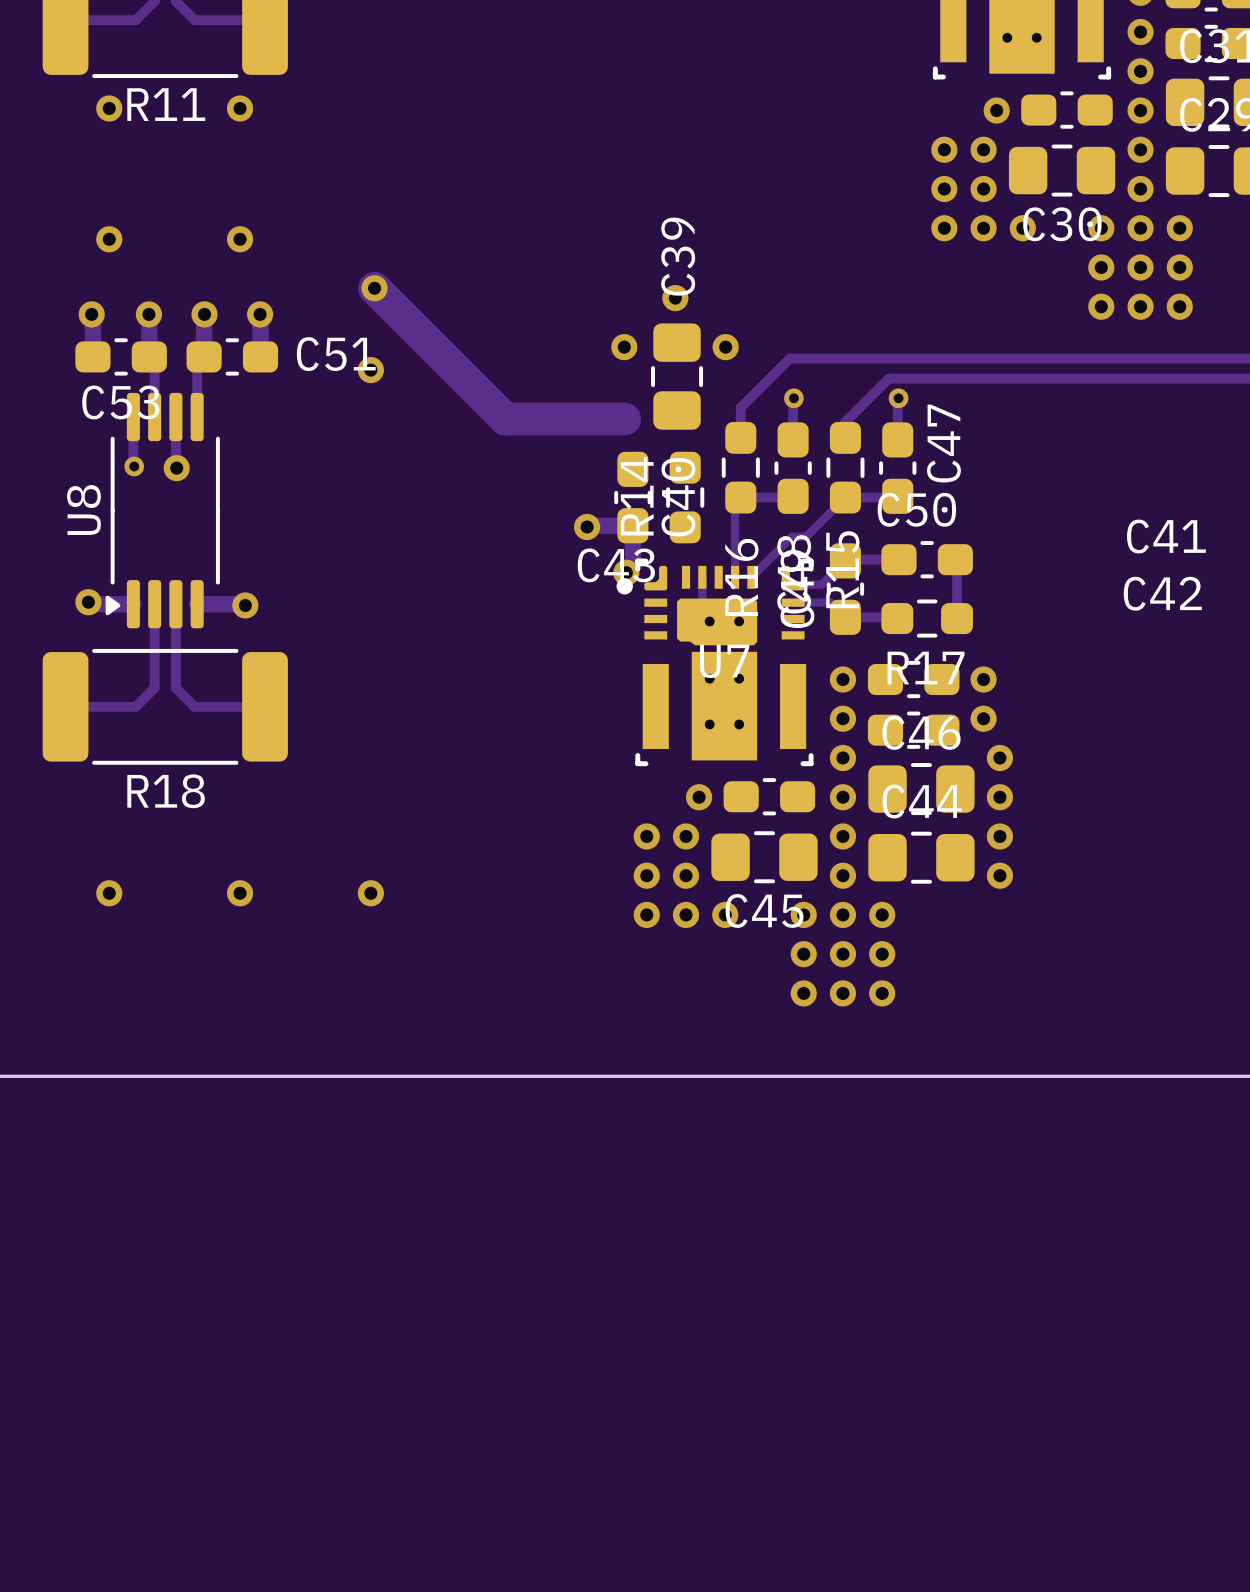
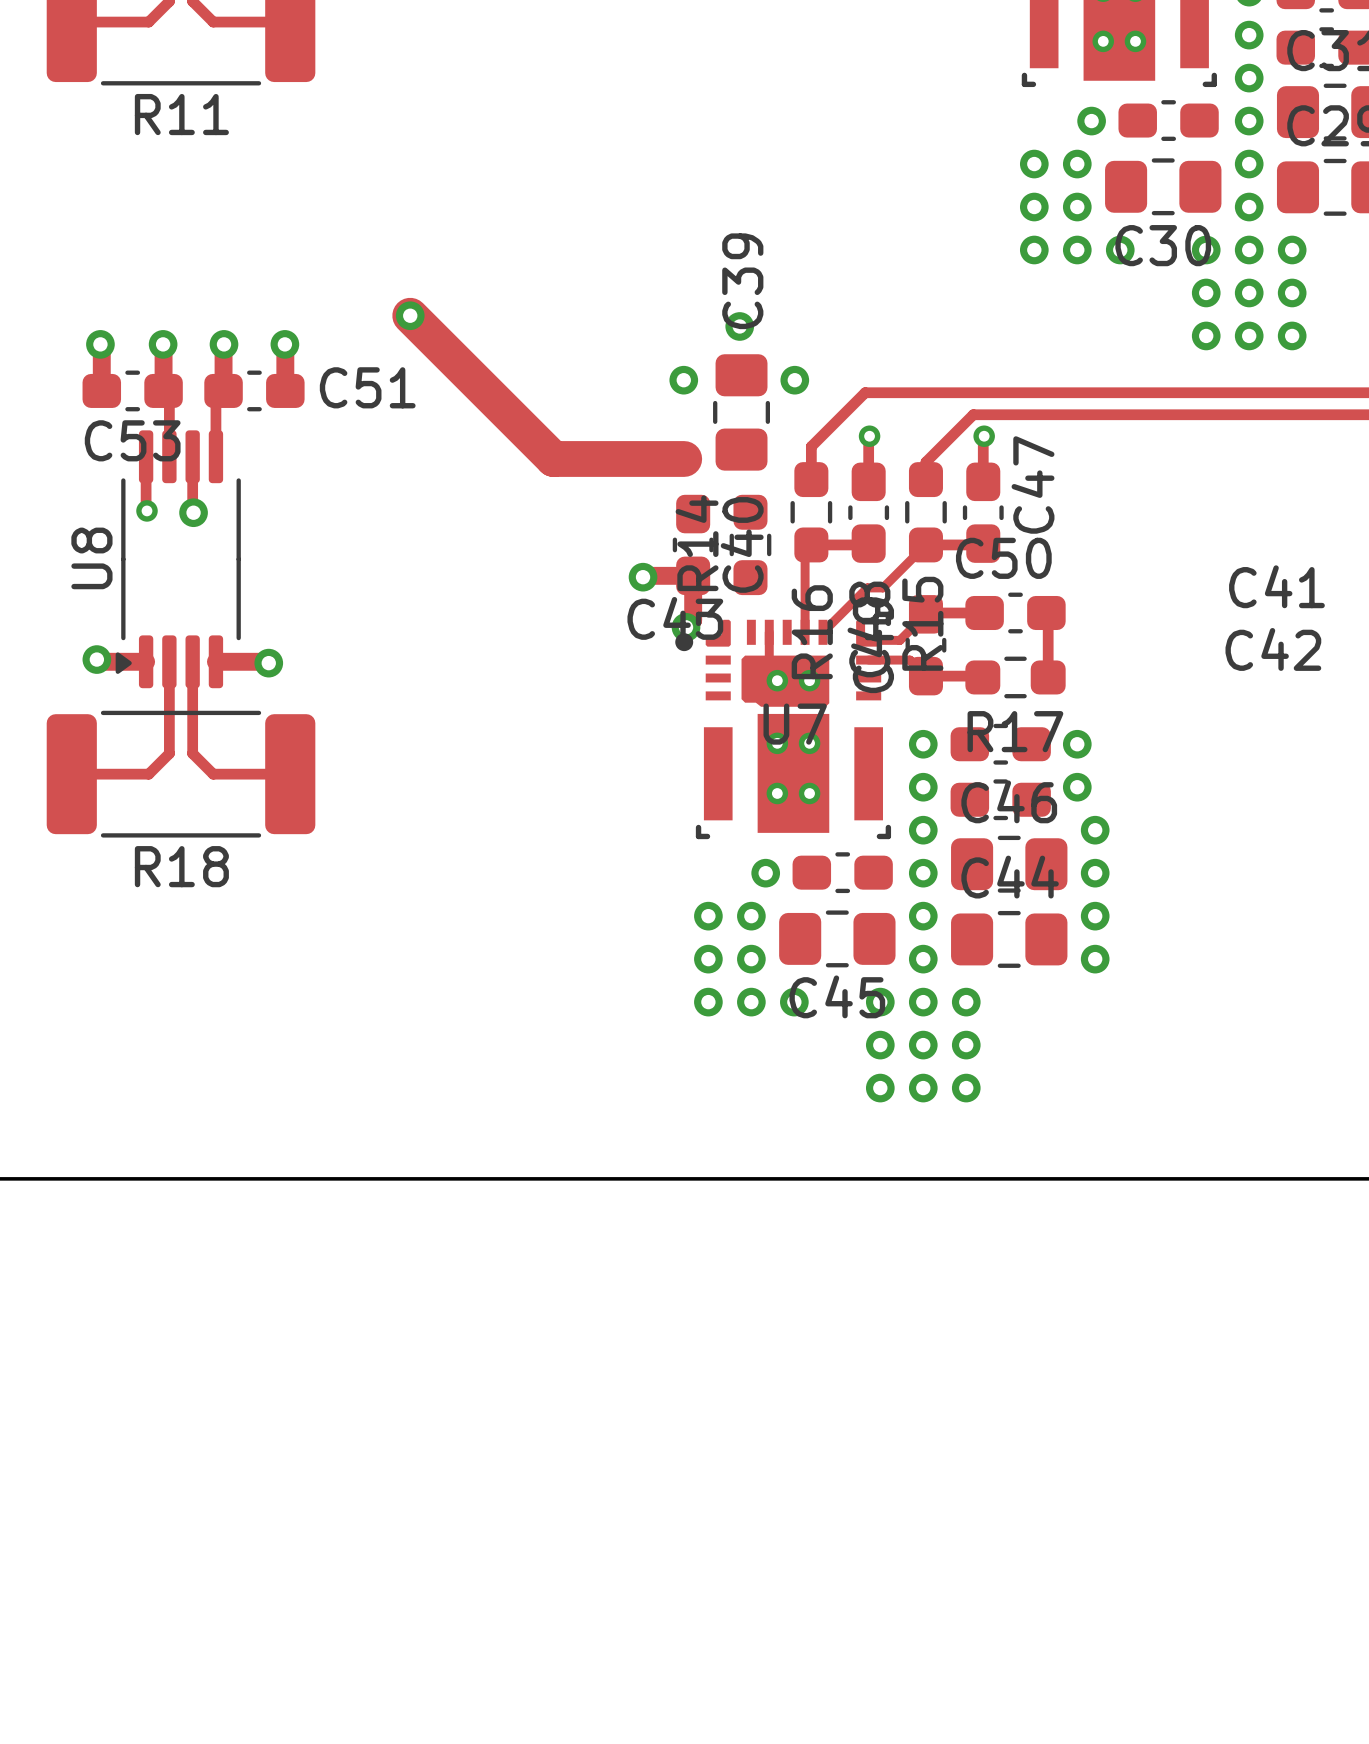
via: (109, 108) -> none
via: (240, 108) -> none
via: (109, 239) -> none
via: (240, 239) -> none
via: (370, 370) -> none
via: (109, 893) -> none
via: (240, 893) -> none
via: (370, 893) -> none

